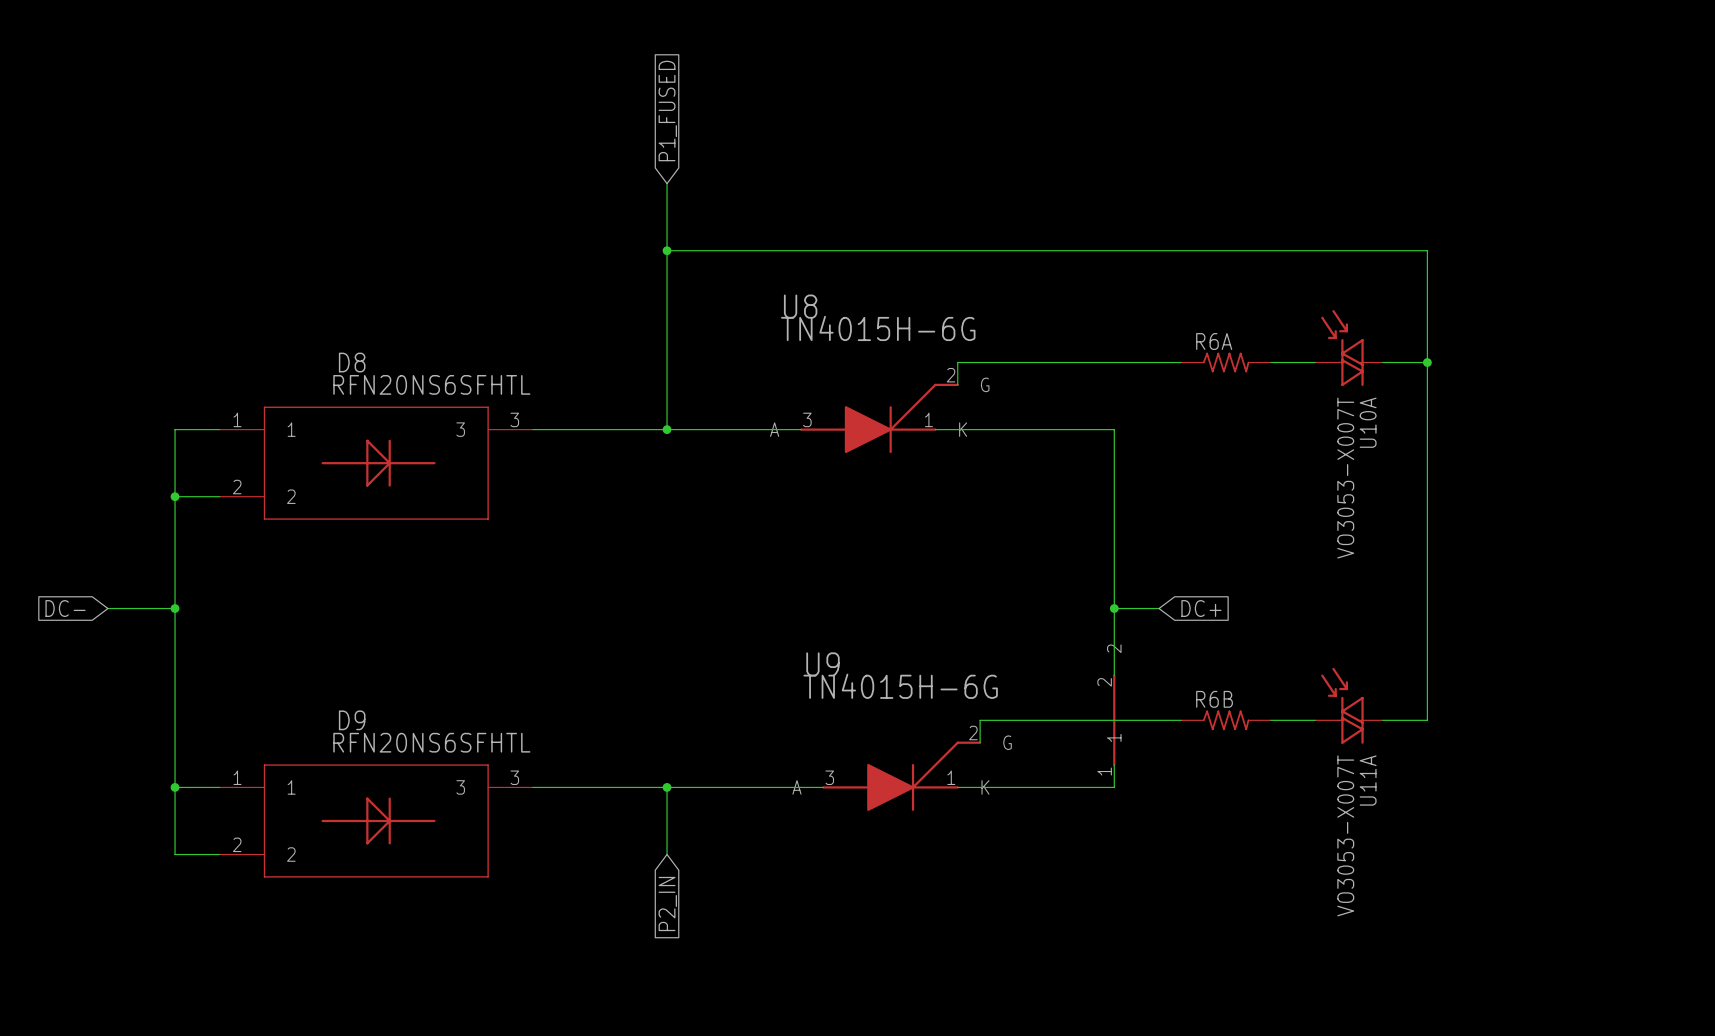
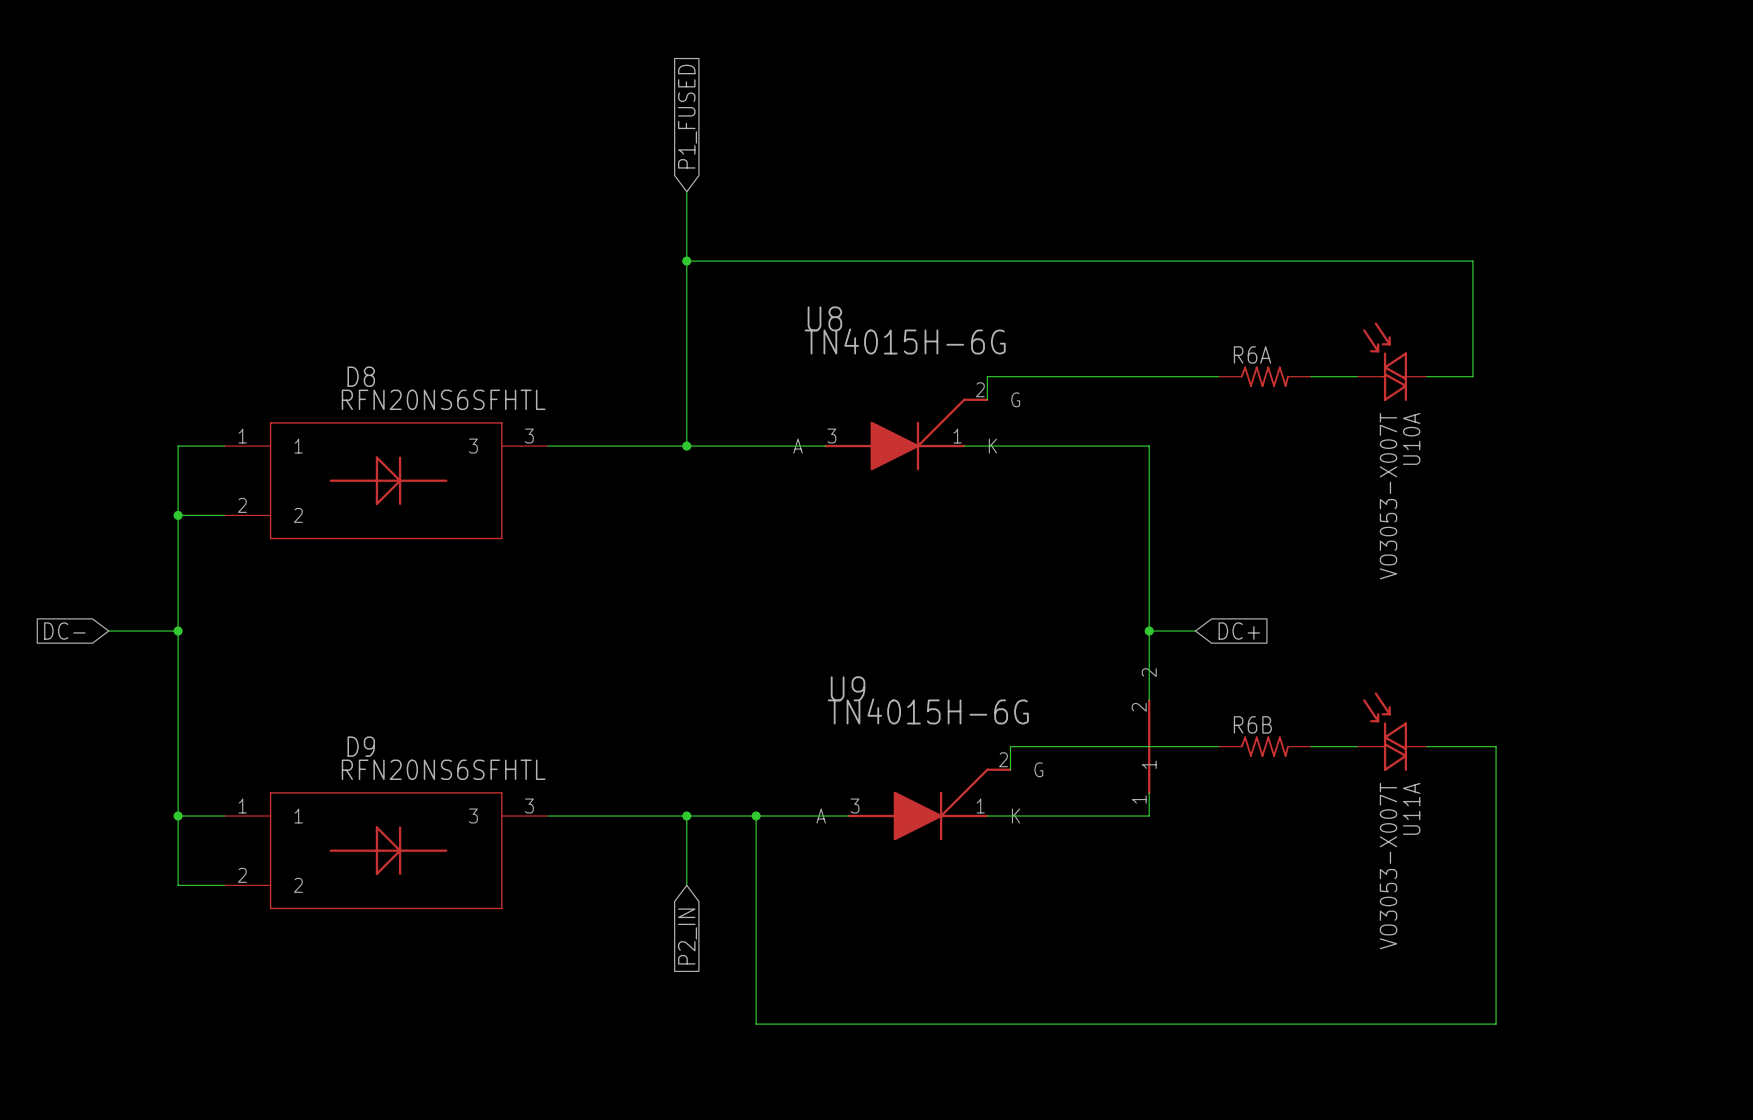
wire: (1427, 362) (1427, 720) -> (756, 816) (756, 1024) (1496, 1024) (1496, 746) (1472, 746)
junction: (1427, 362) -> none
junction: none -> (756, 816)

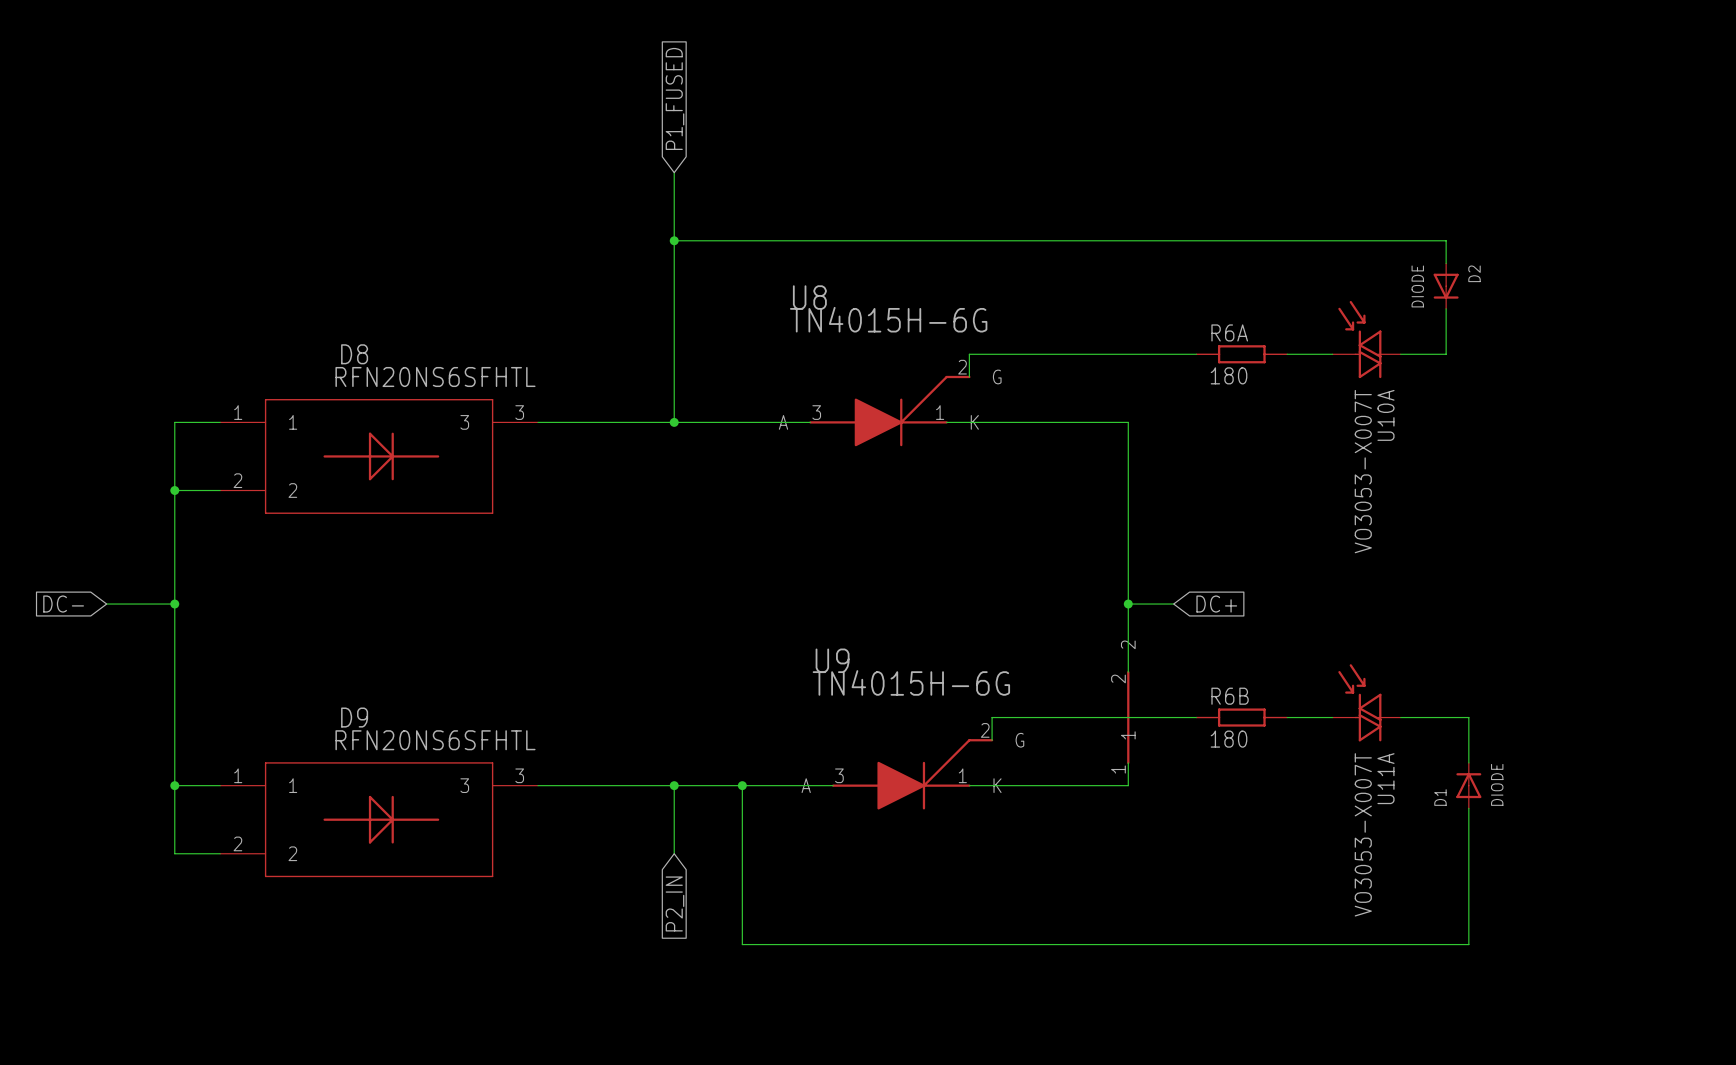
D2: none -> DIODE (1446, 286)
R6A symbol: [1218, 366, 1312, 387] -> [1195, 345, 1288, 364]
R6A value: none -> 180 (1229, 375)
R6B symbol: [1218, 736, 1312, 757] -> [1195, 708, 1288, 727]
R6B value: none -> 180 (1229, 739)
D1: none -> DIODE (1468, 785)
wire: (756, 977) (756, 1024) (1496, 1024) (1496, 977) -> (742, 944) (1468, 944)

